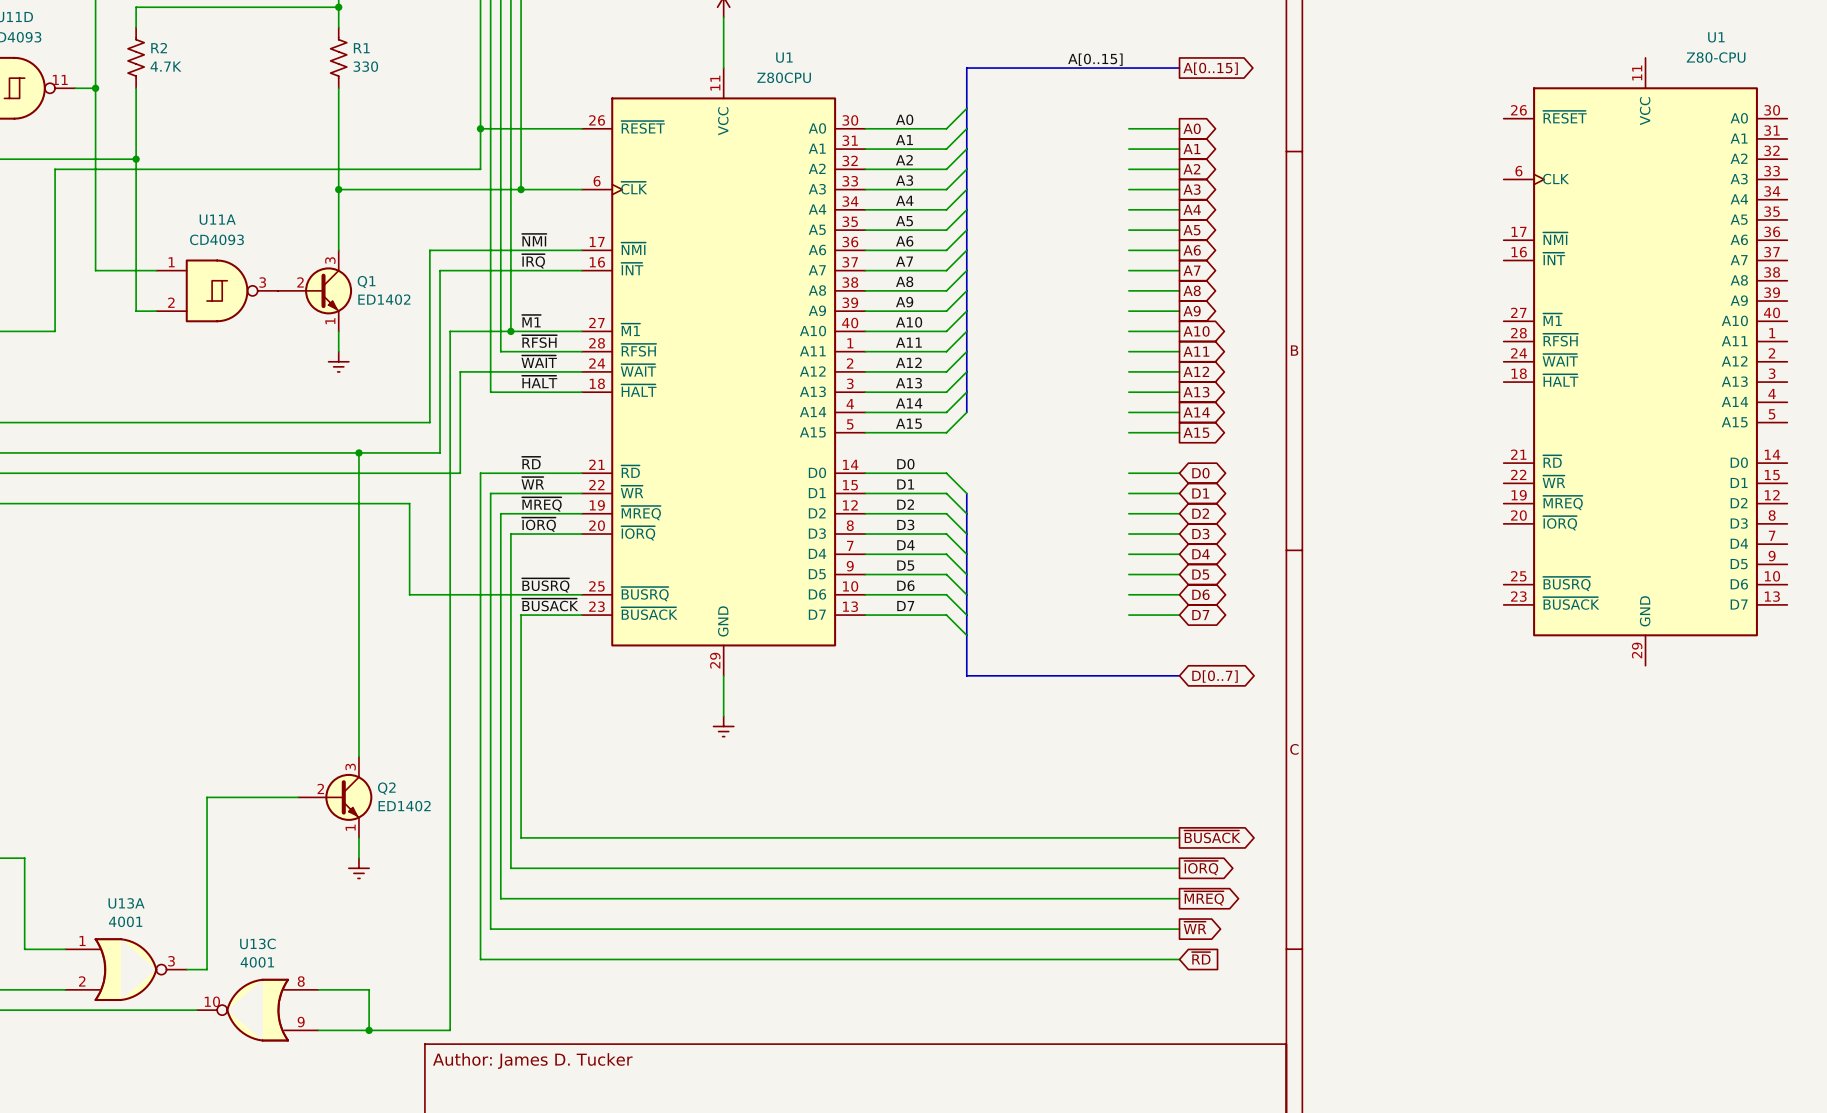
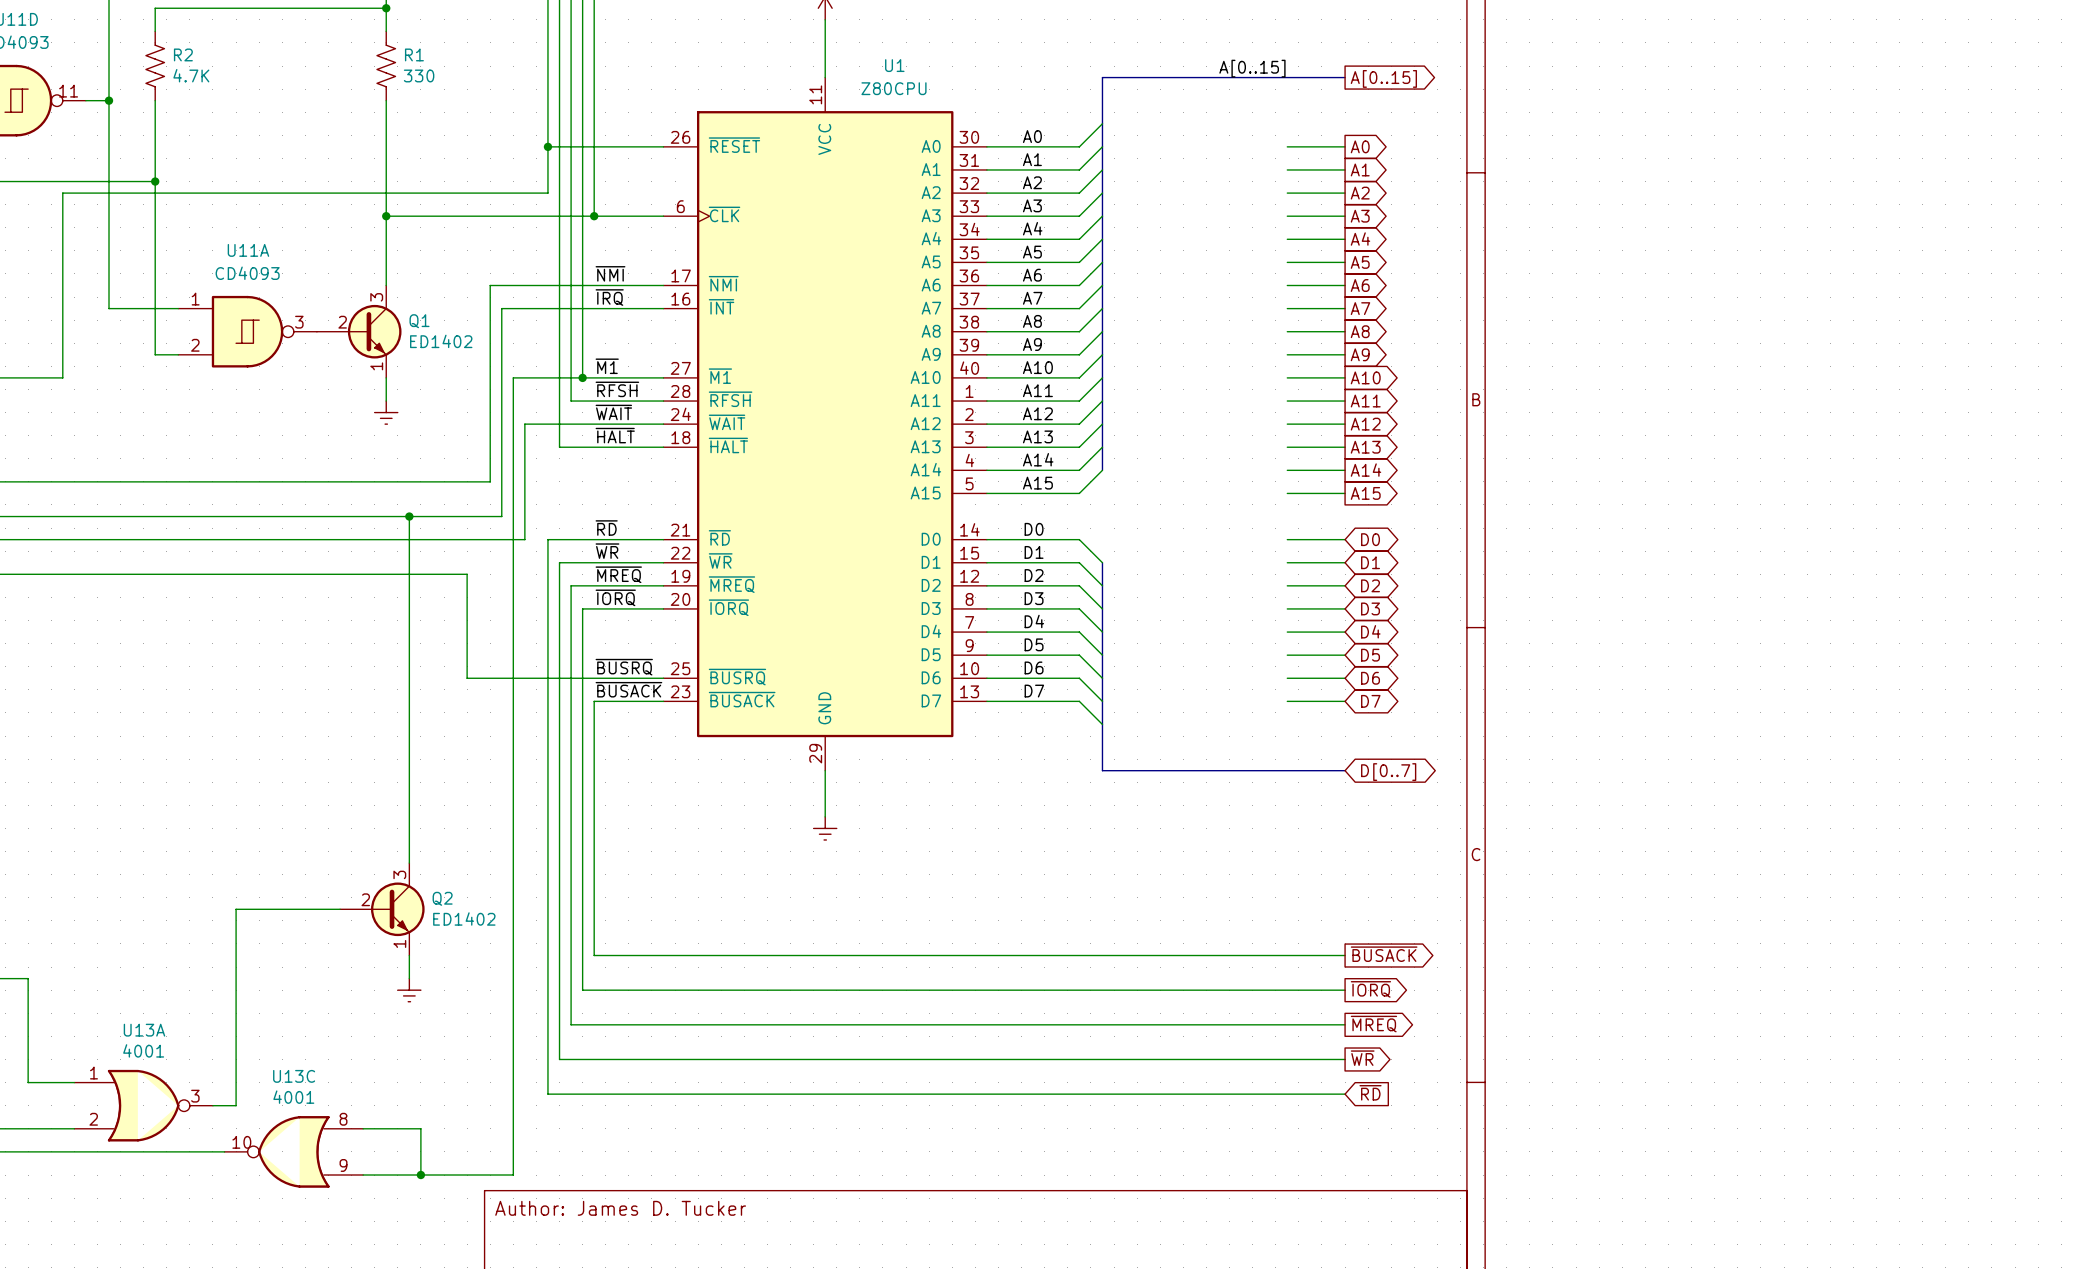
U1: Z80-CPU (1645, 361) -> none

